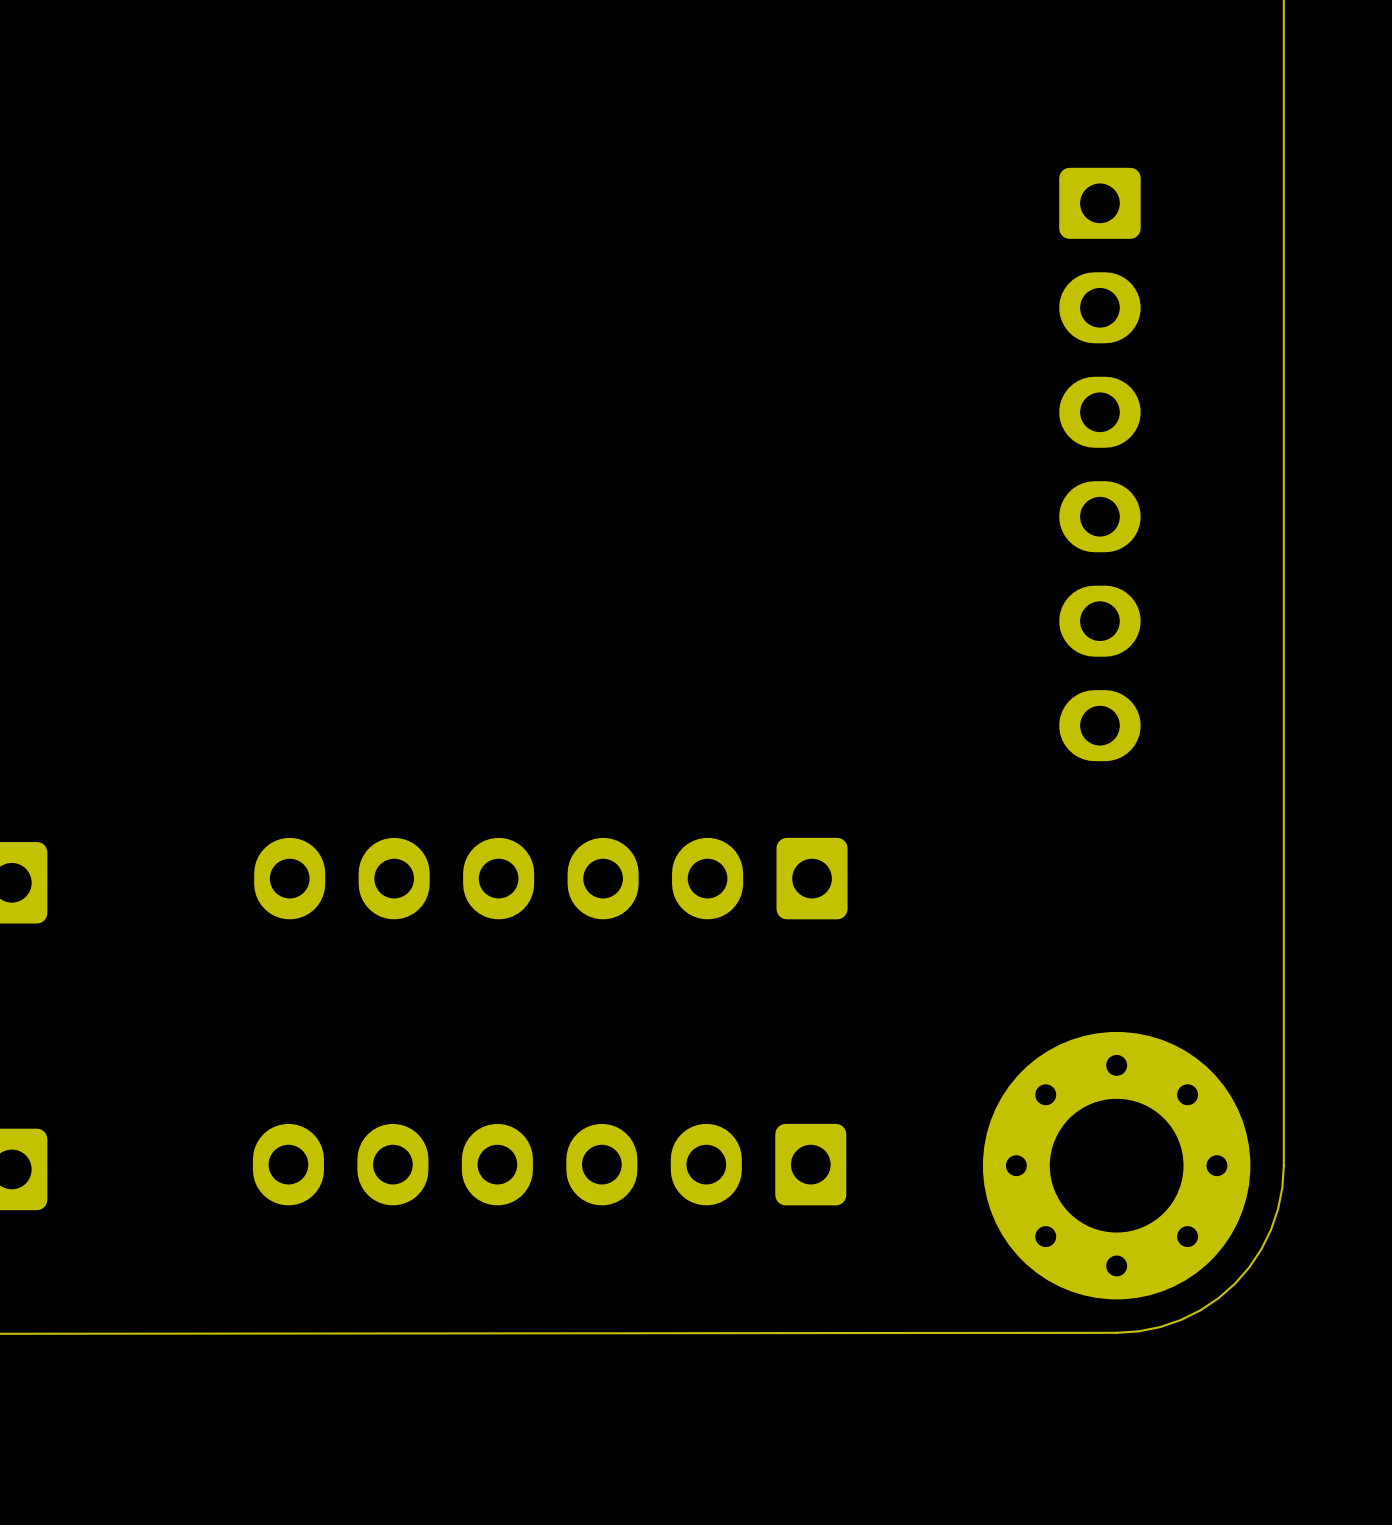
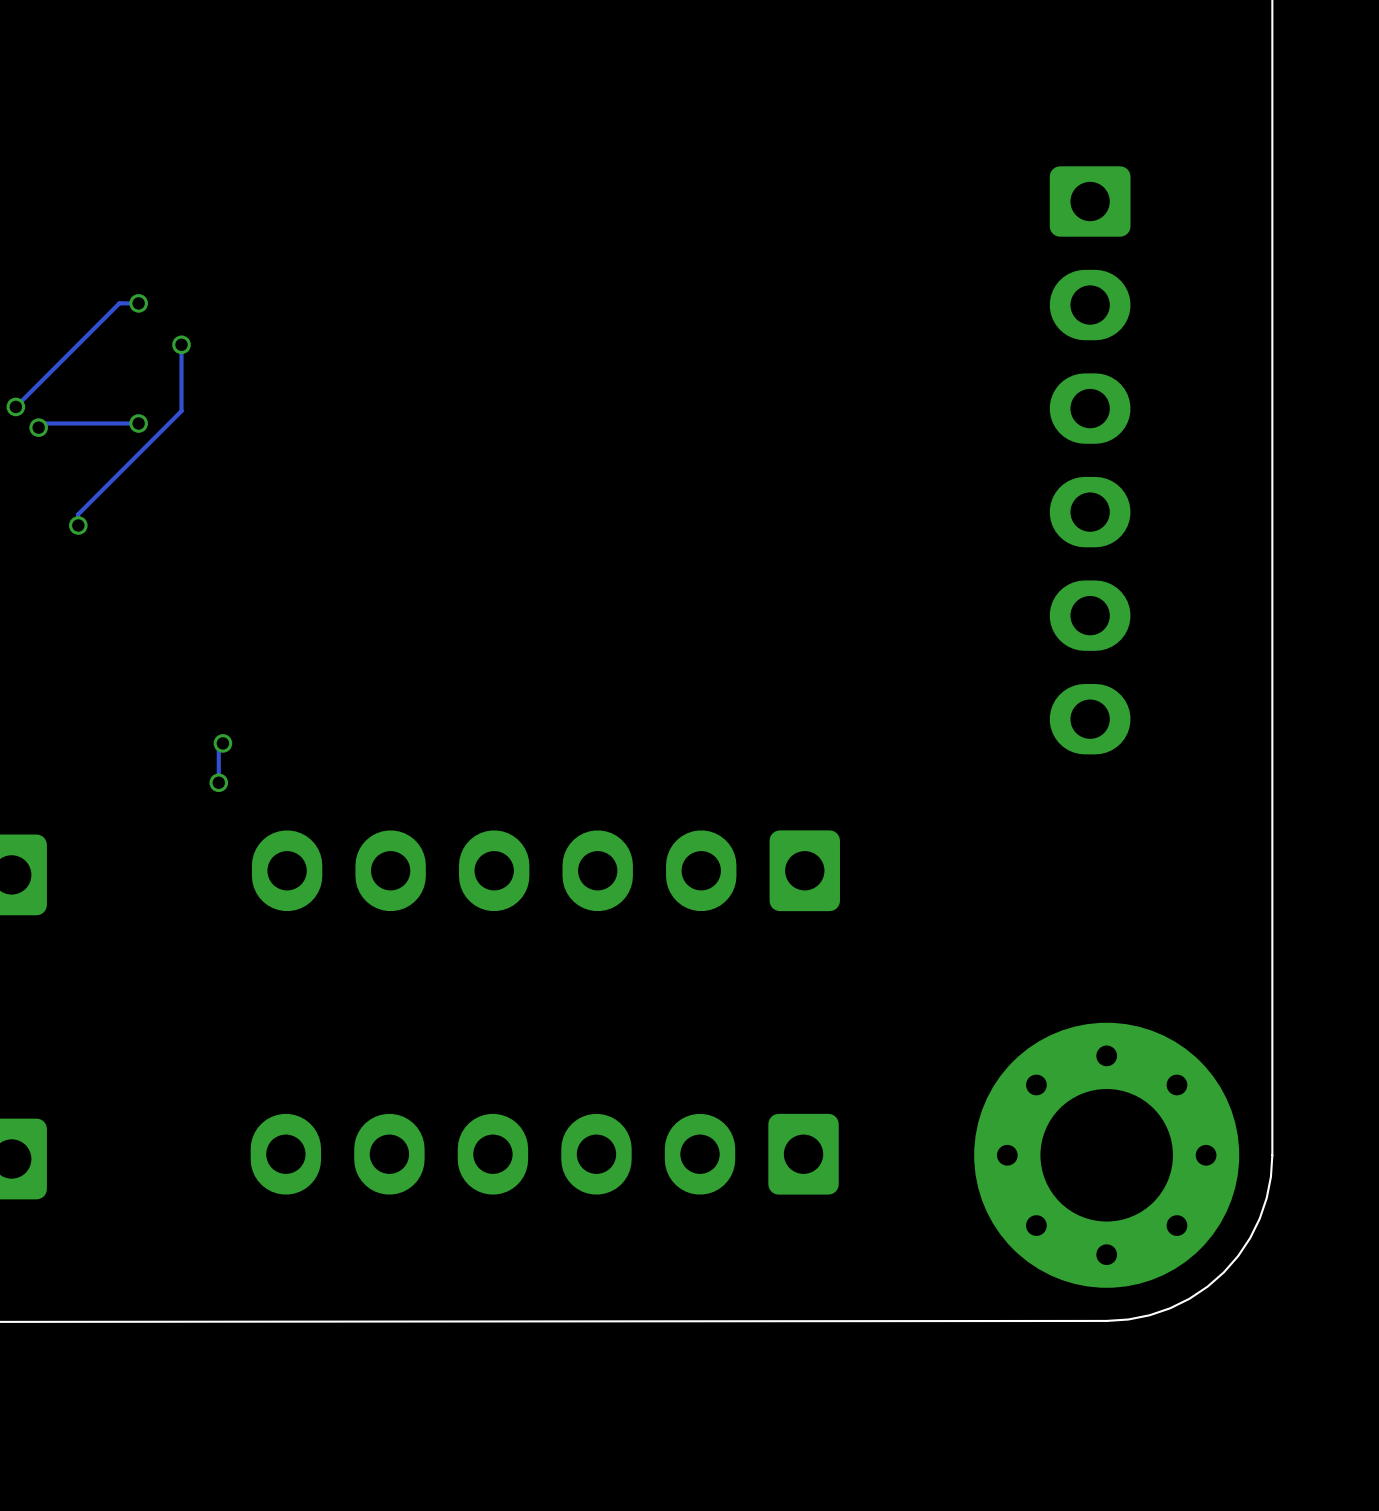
track: none -> (138, 303) (119, 303) (15, 406)
via: none -> (138, 303)
track: none -> (181, 344) (181, 411) (77, 514) (77, 525)
via: none -> (181, 344)
via: none -> (15, 406)
track: none -> (138, 423) (42, 423) (38, 427)
via: none -> (138, 423)
via: none -> (38, 427)
via: none -> (78, 525)
track: none -> (222, 743) (218, 747) (218, 782)
via: none -> (222, 743)
via: none -> (218, 782)

